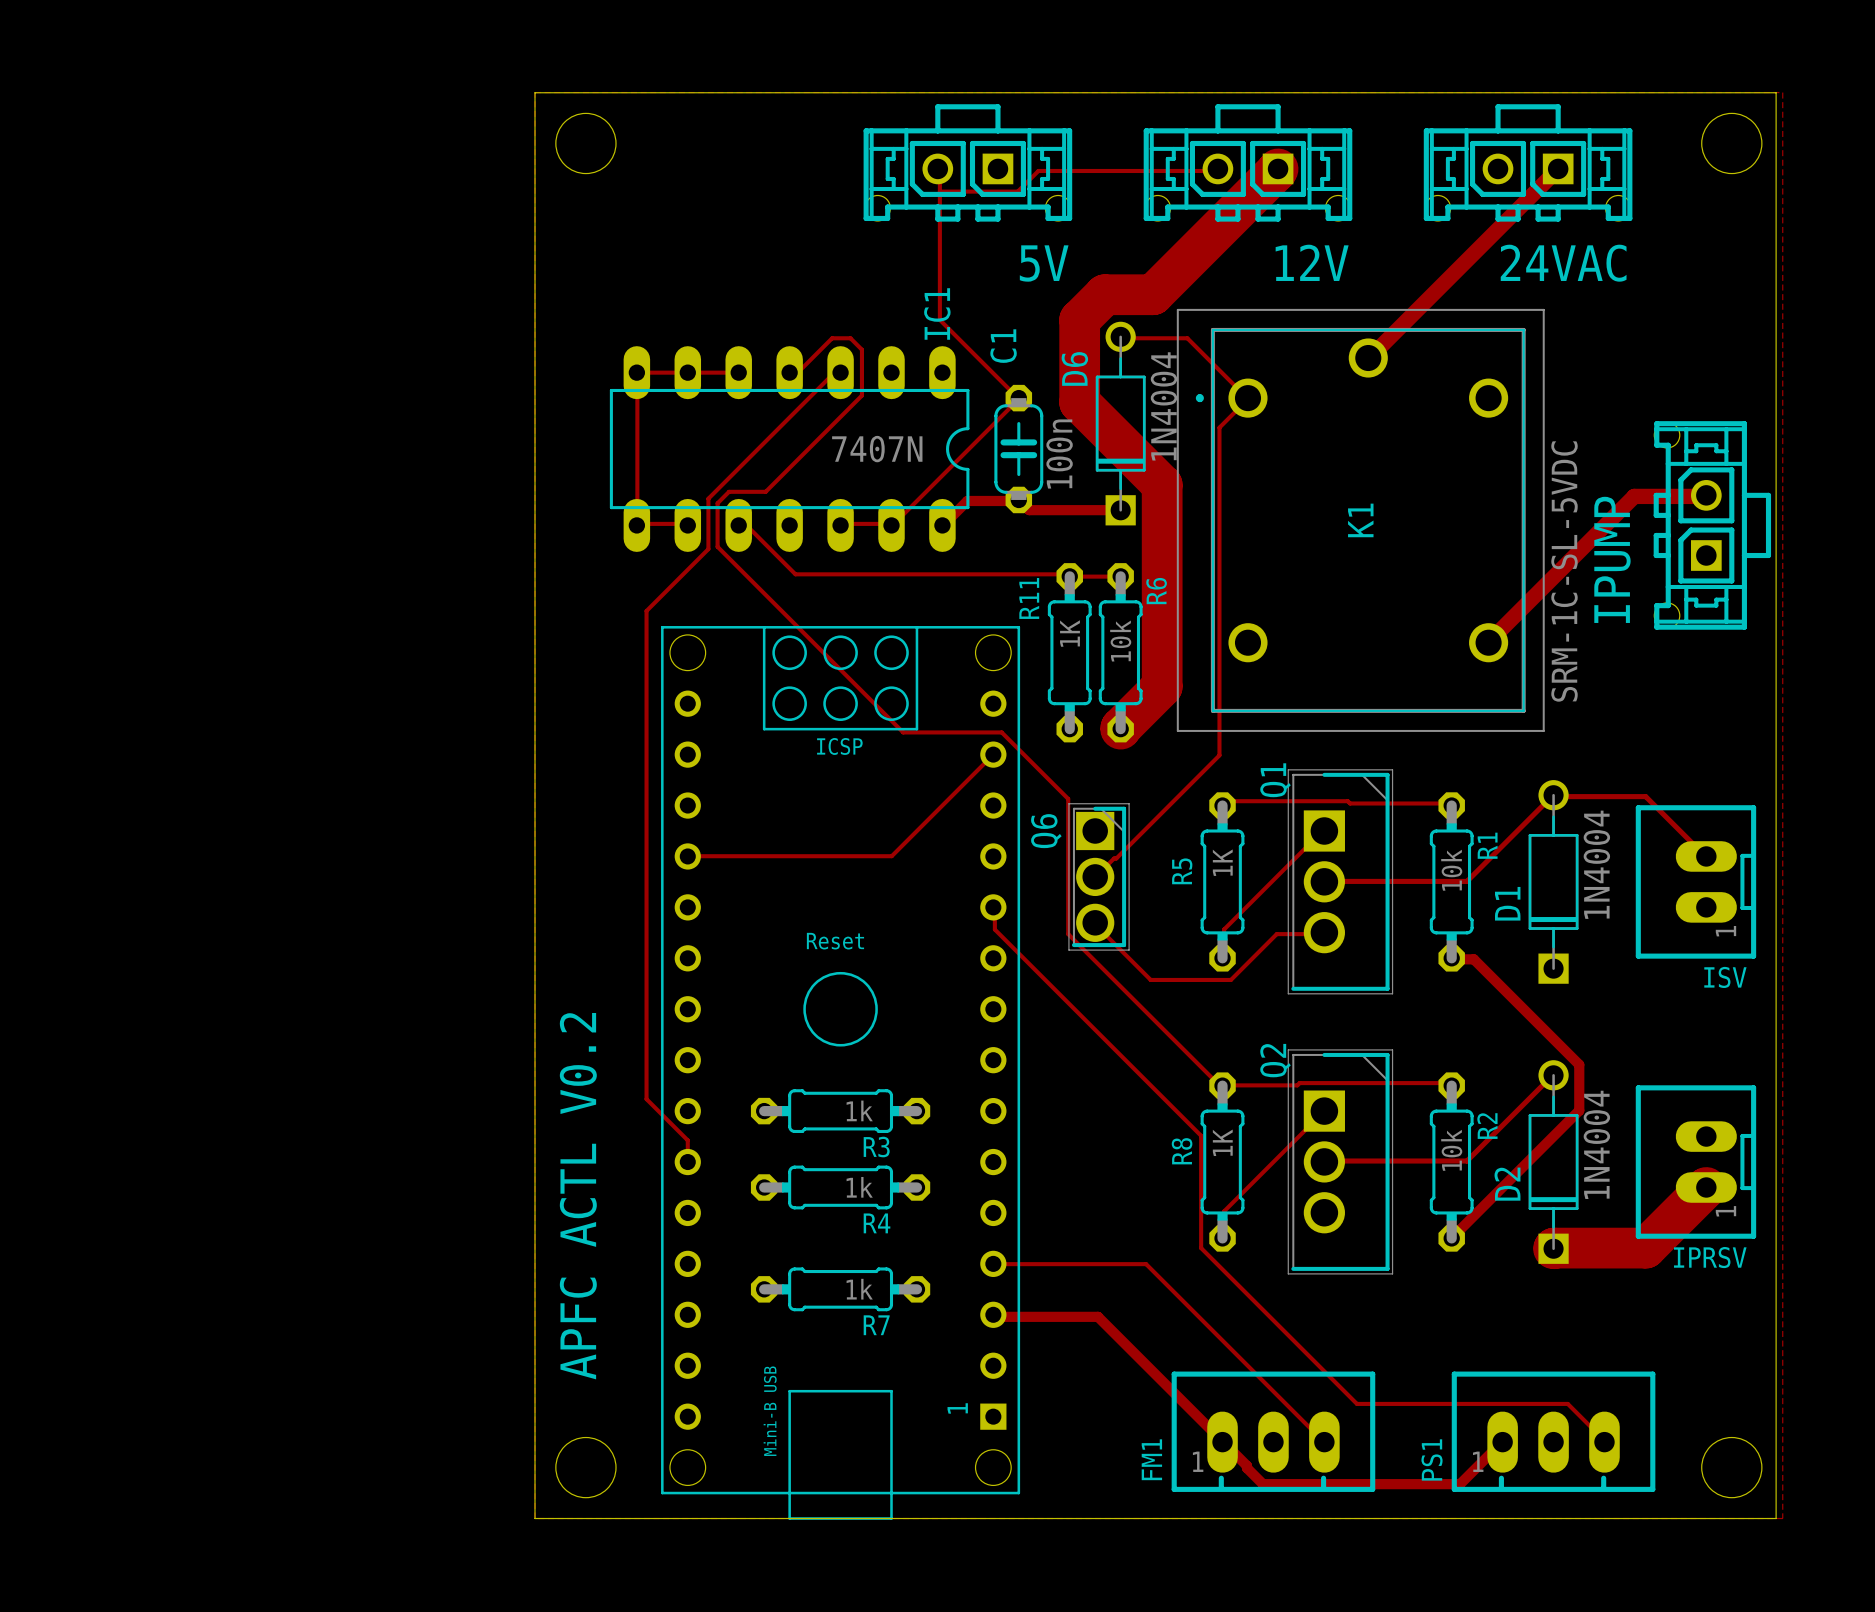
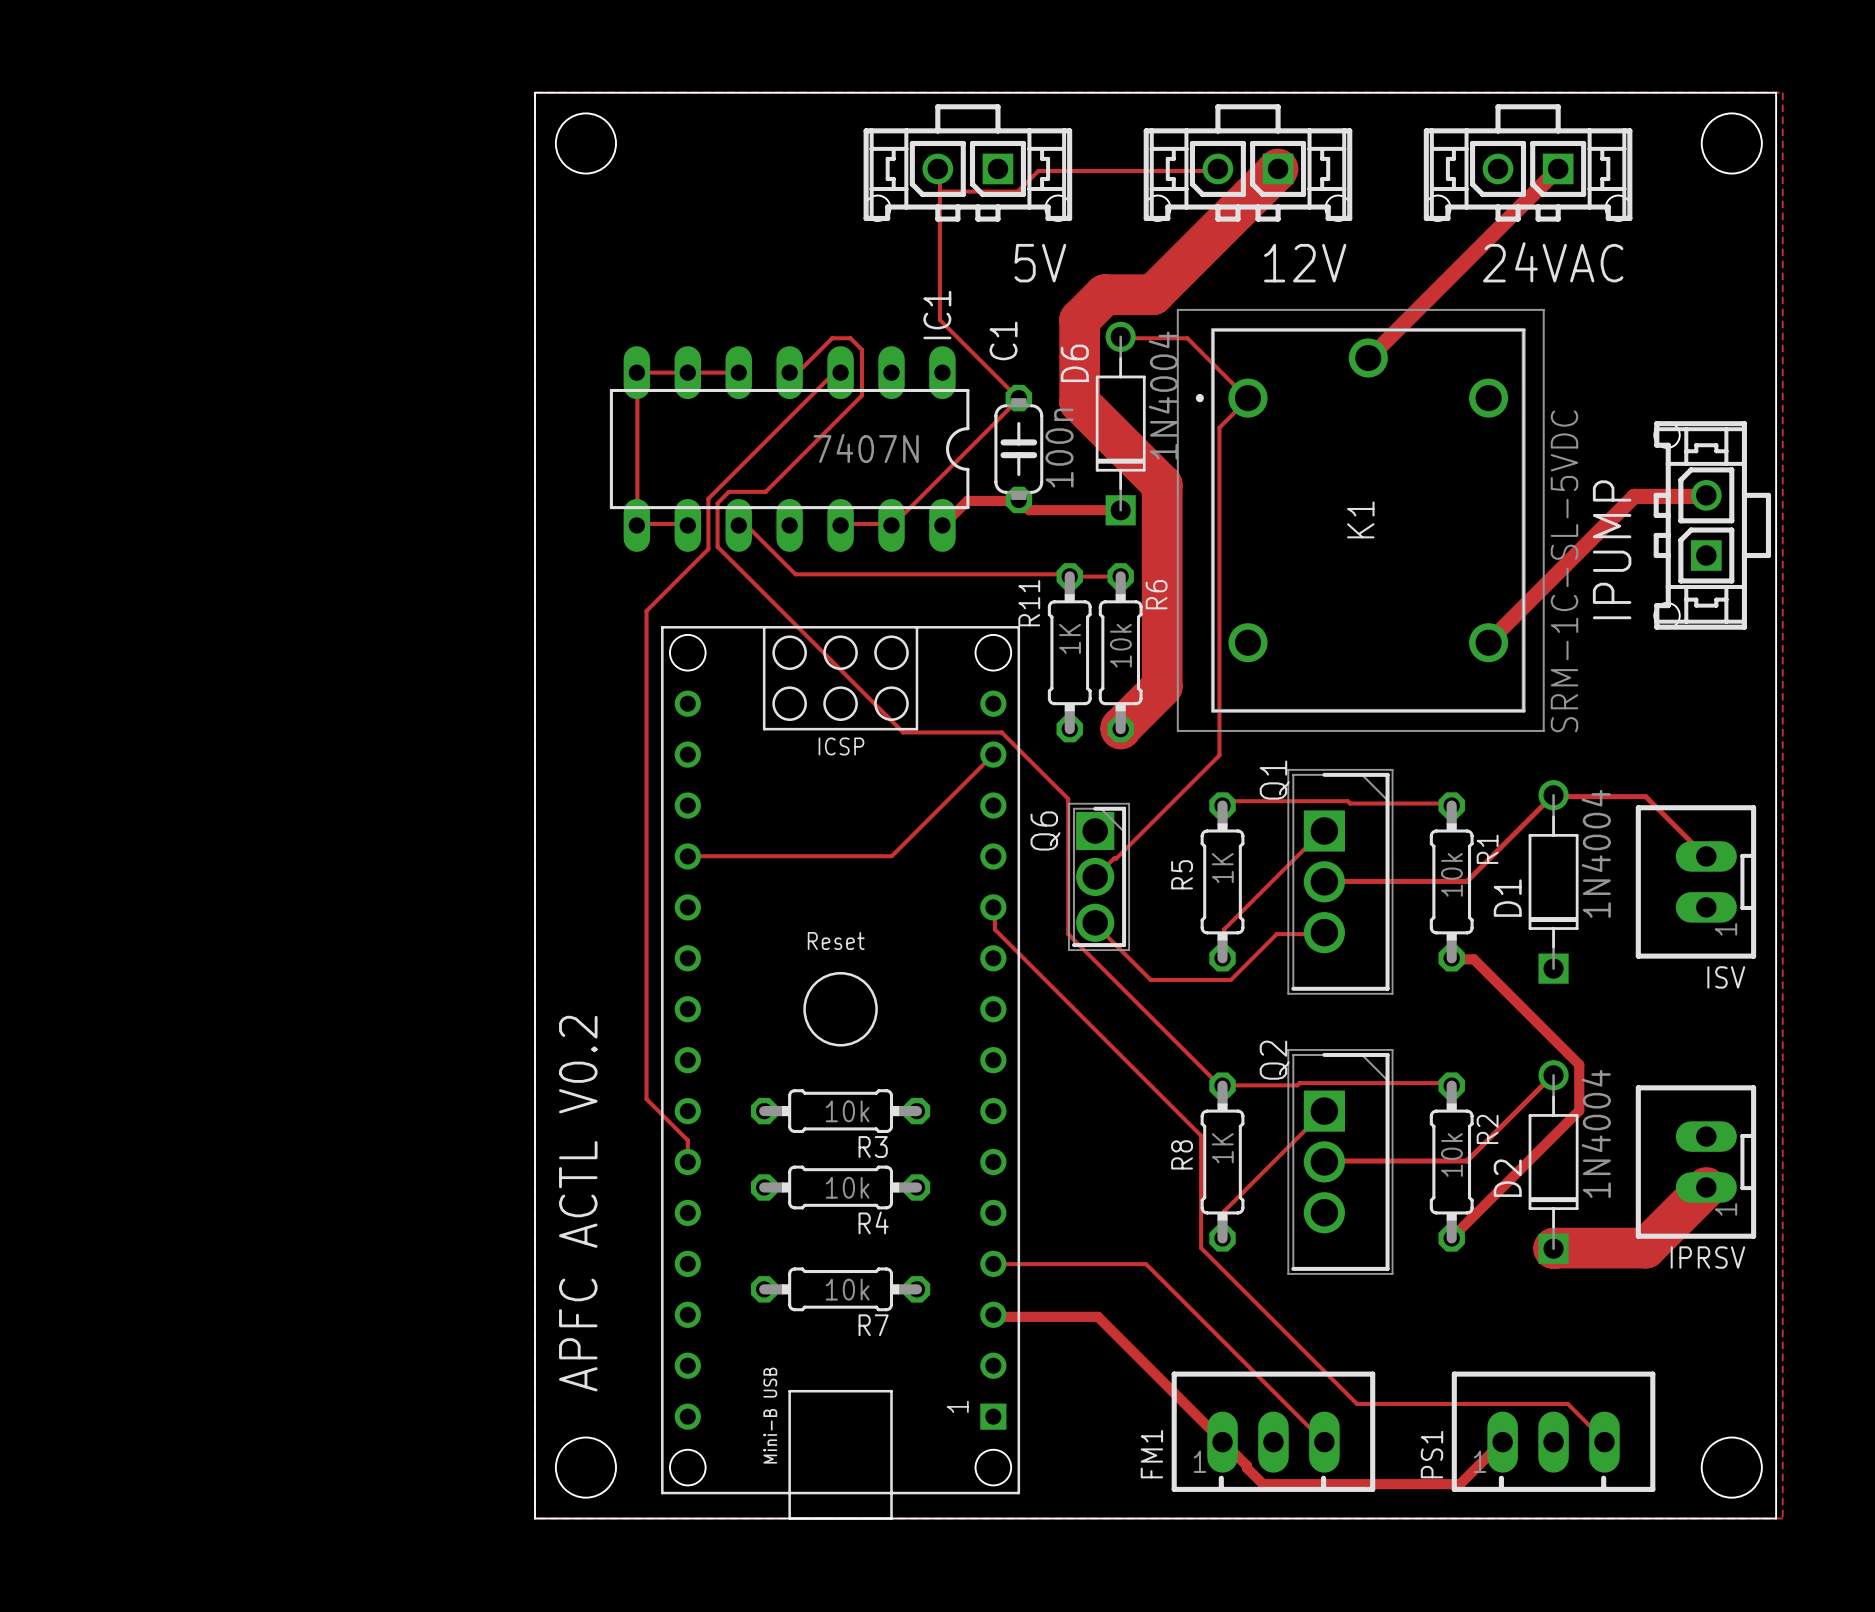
R3 value: 1k (859, 1110) -> 10k (847, 1111)
R4 value: 1k (859, 1187) -> 10k (847, 1187)
R7 value: 1k (859, 1289) -> 10k (847, 1289)

